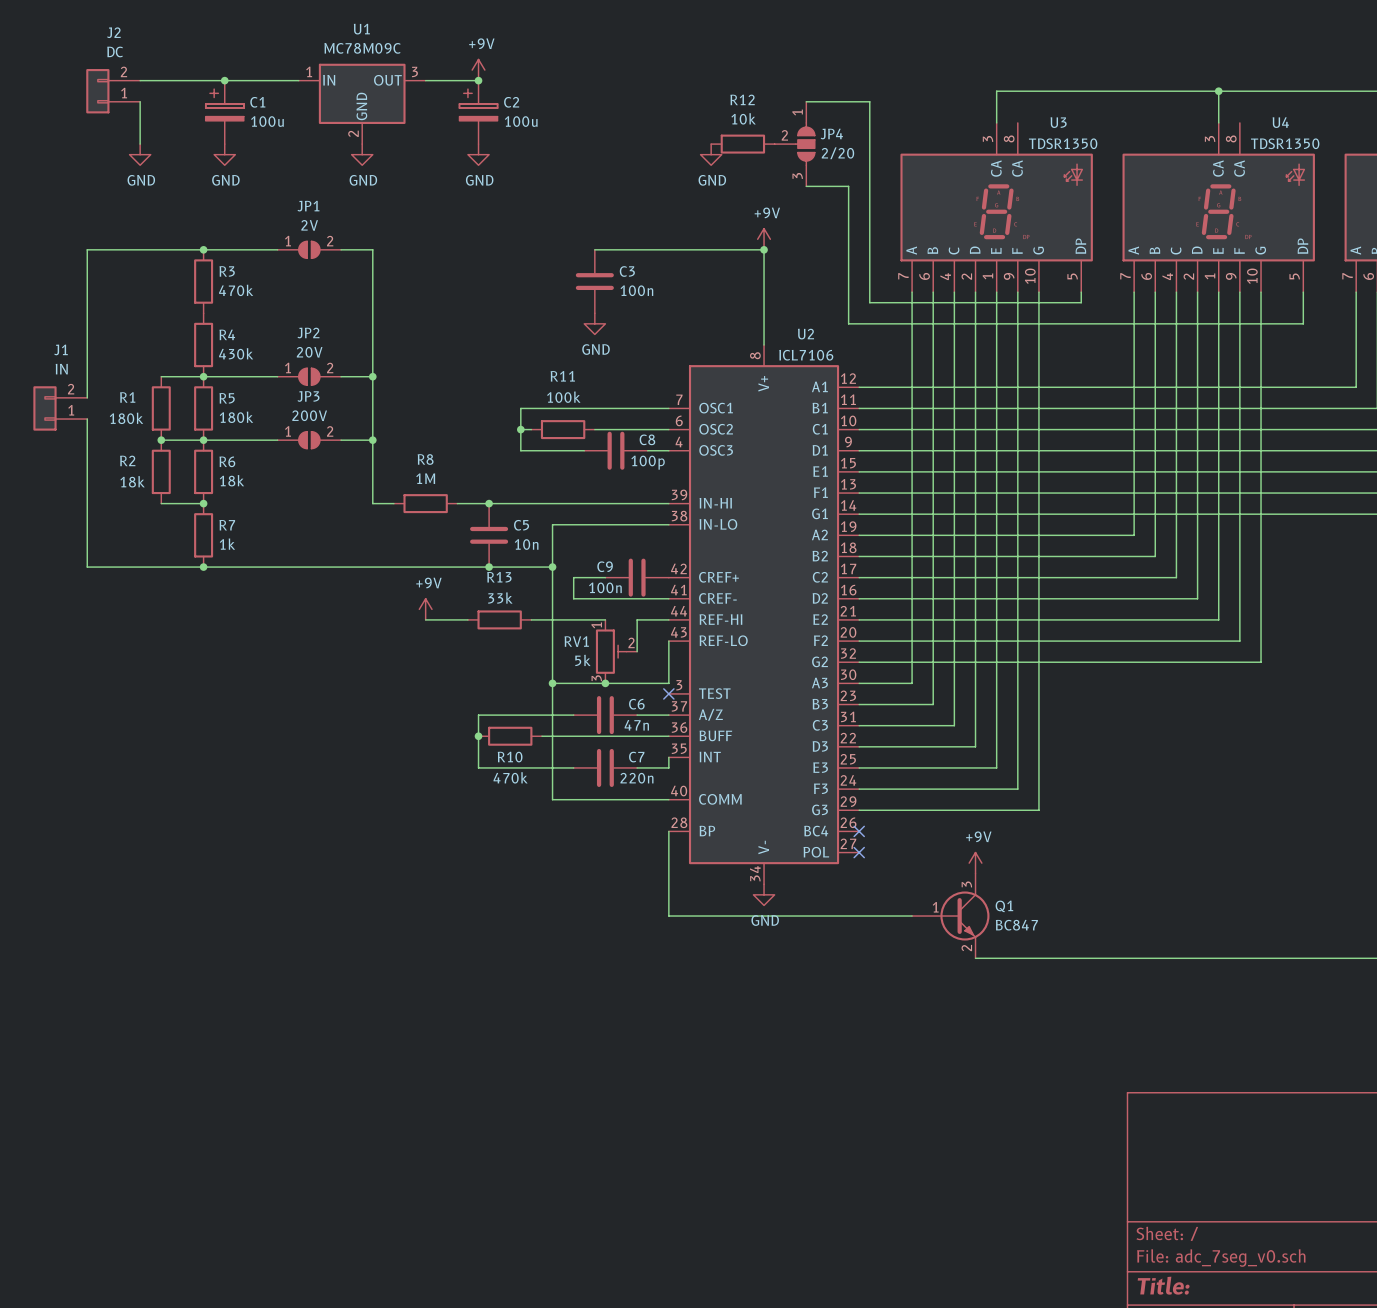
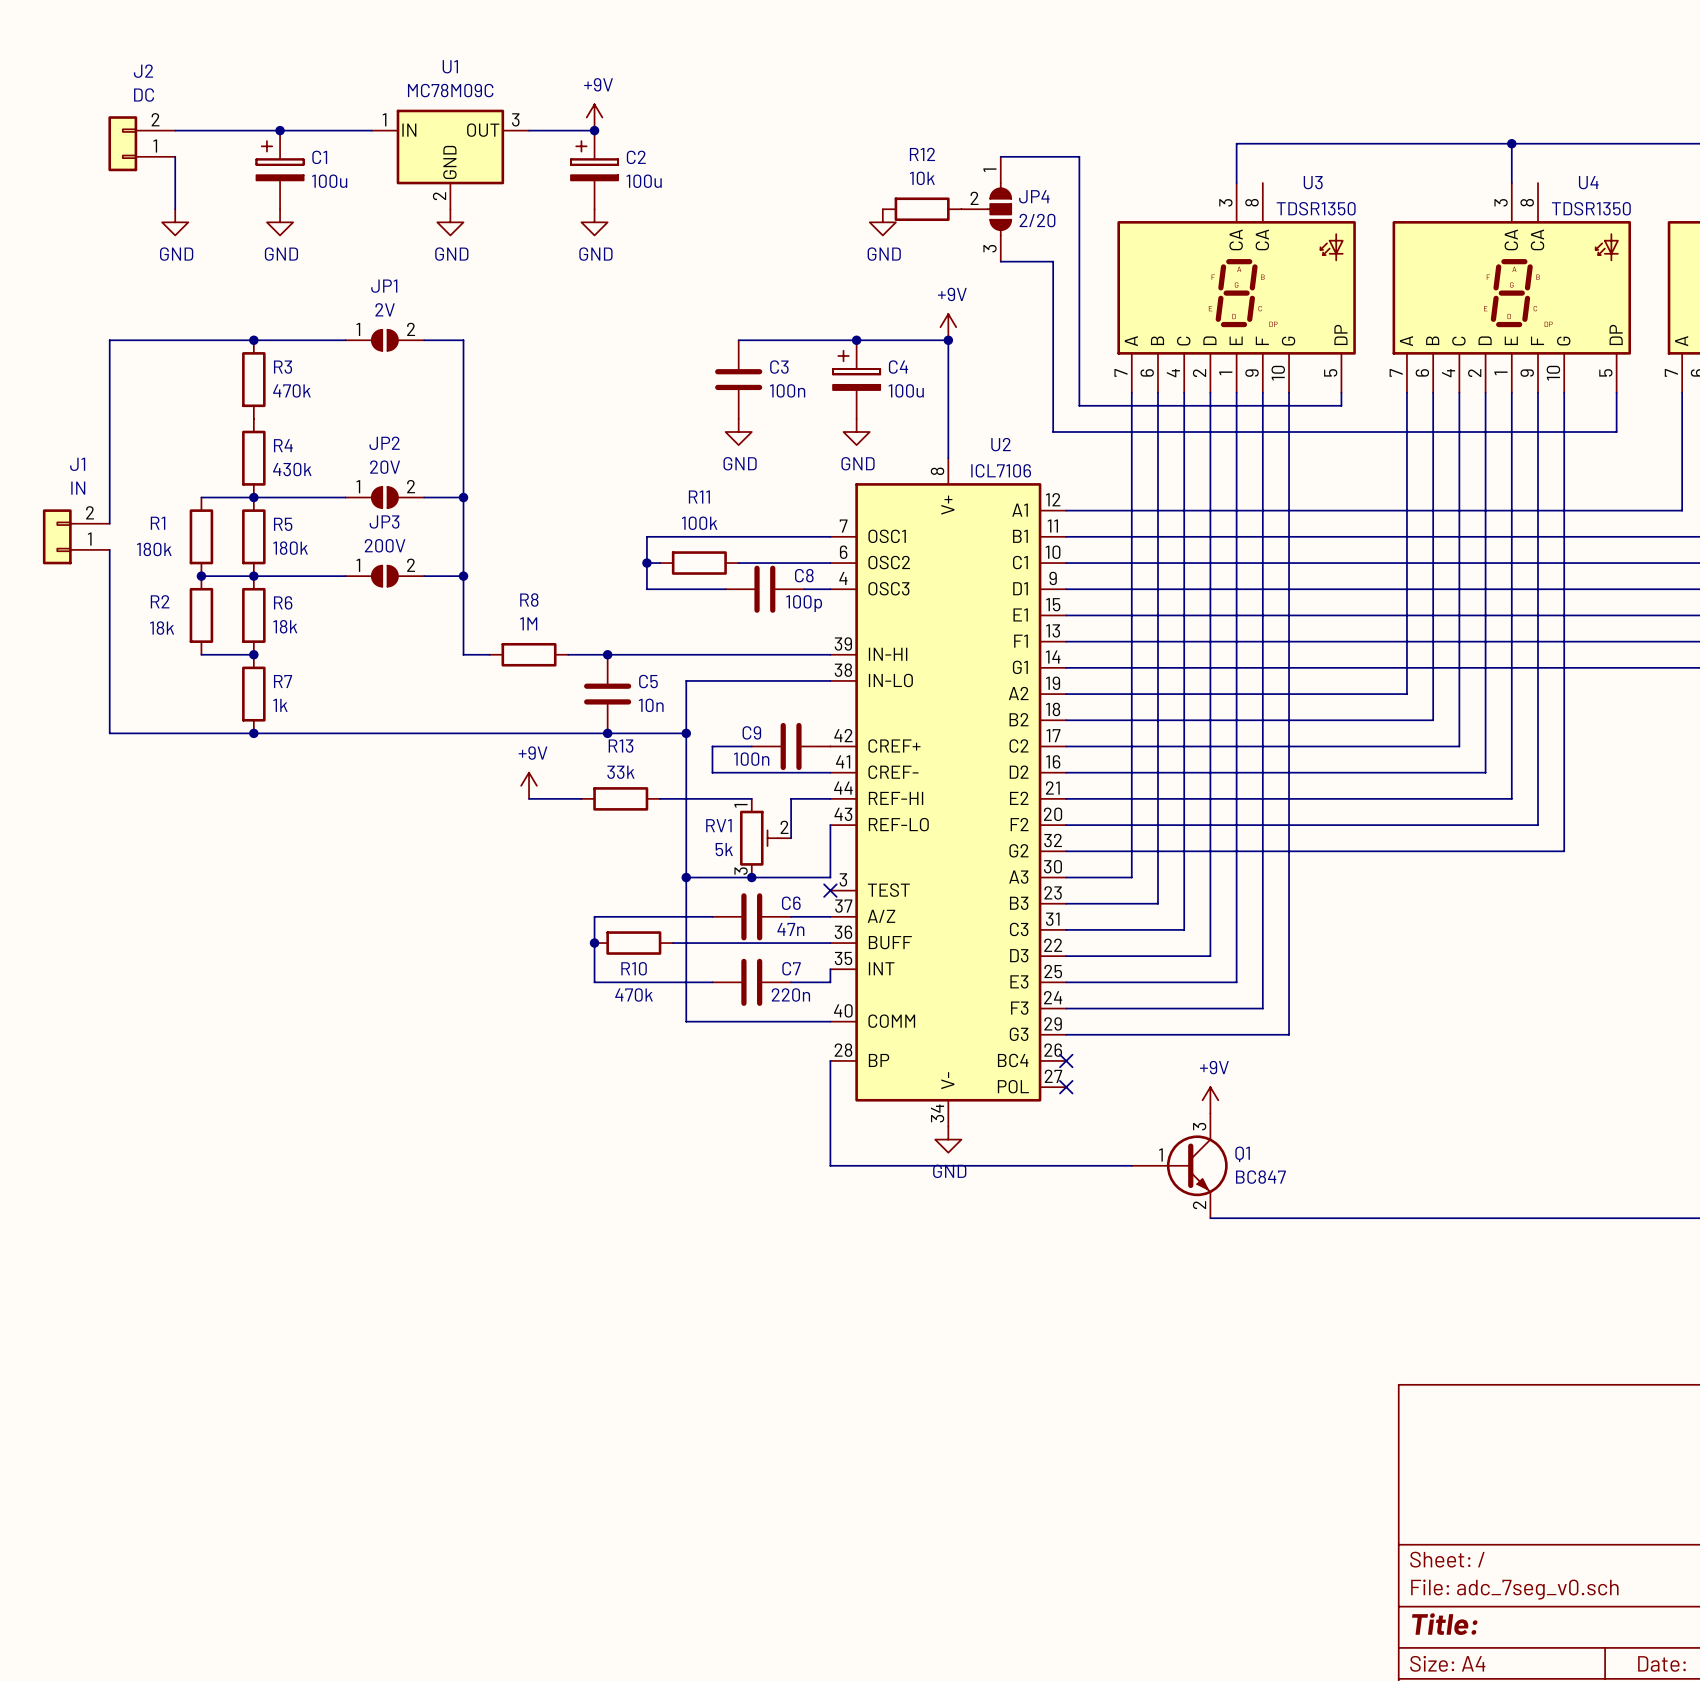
junction: none -> (856, 340)
C4: none -> 100u (856, 379)
power symbol: none -> GND (856, 432)

